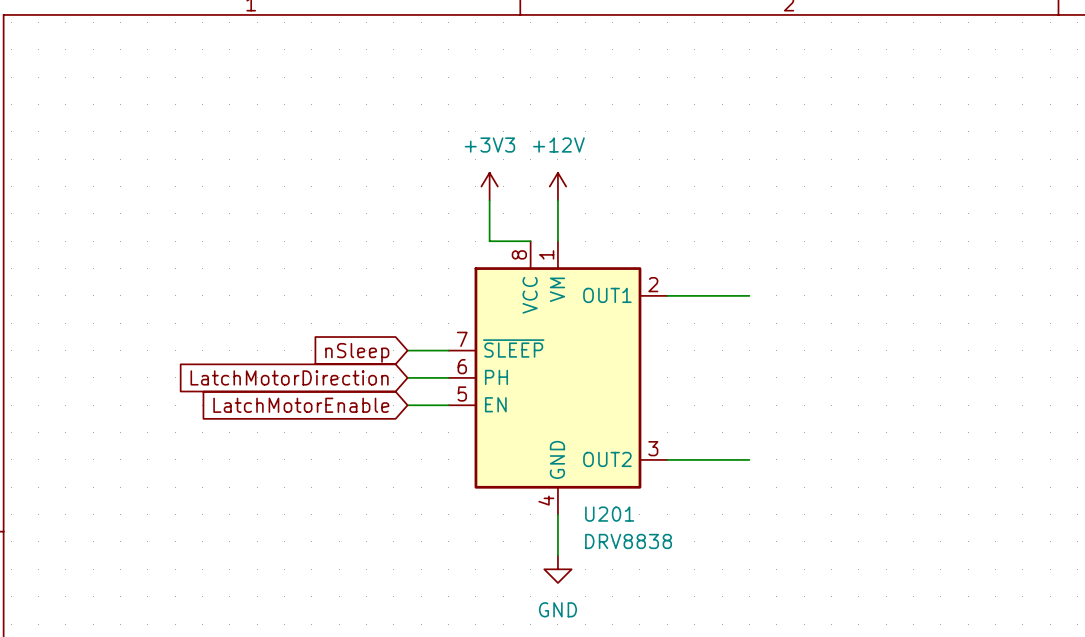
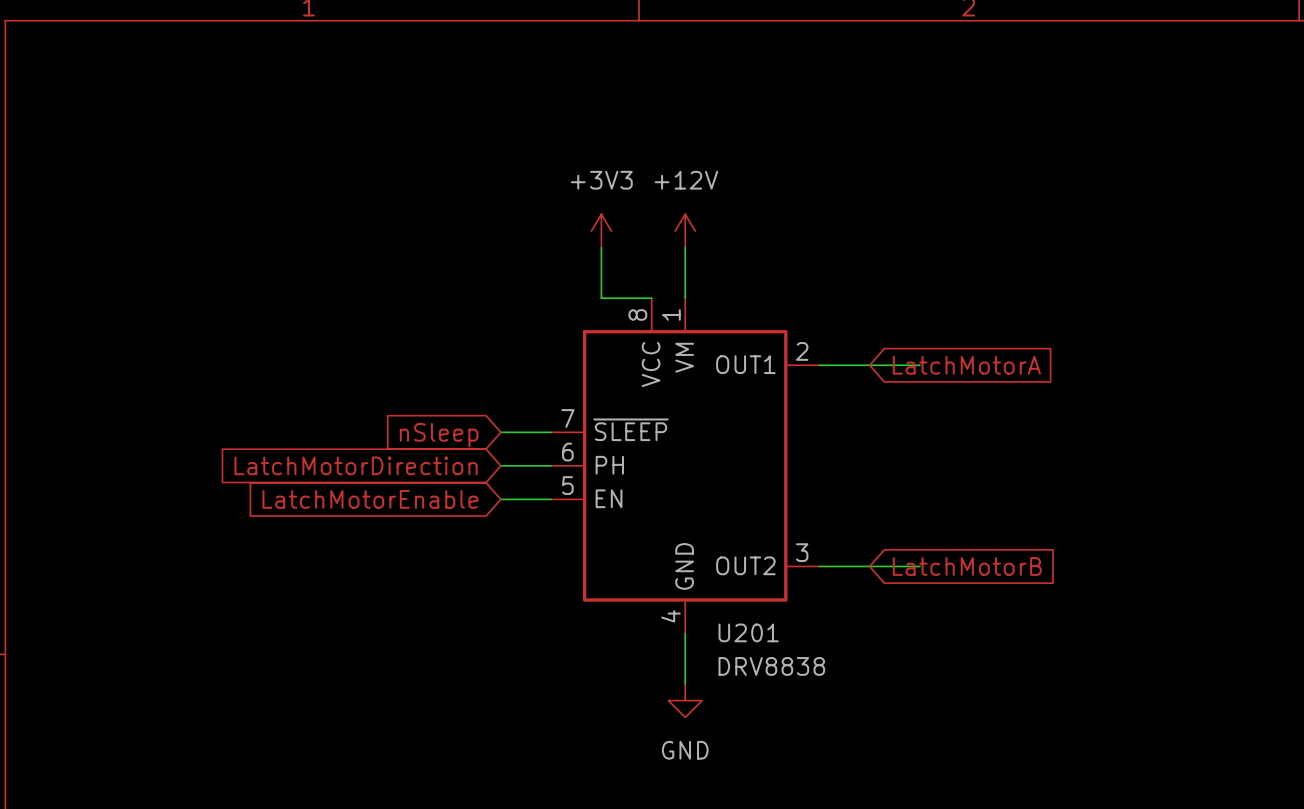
global label: none -> LatchMotorA (966, 365)
global label: none -> LatchMotorB (967, 566)

